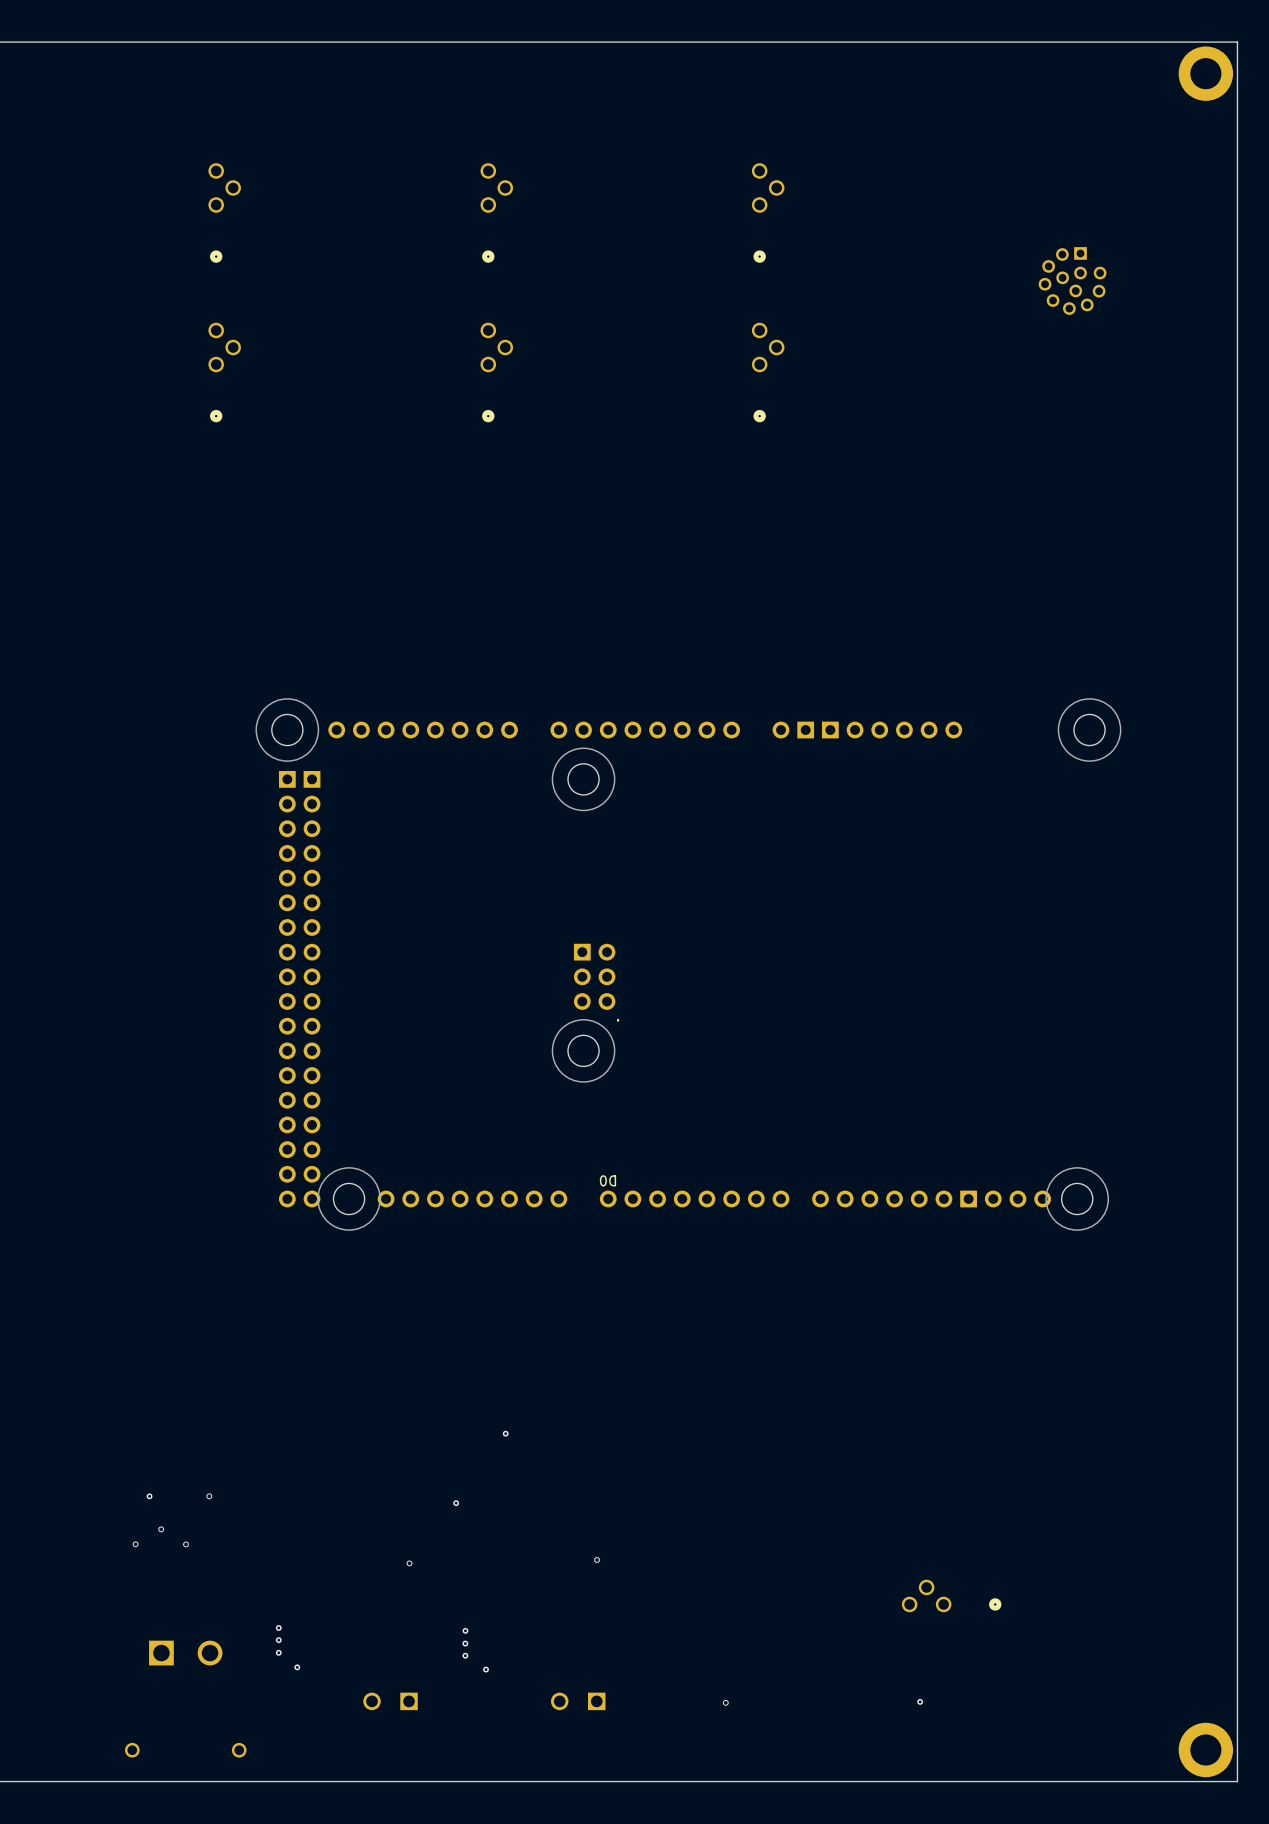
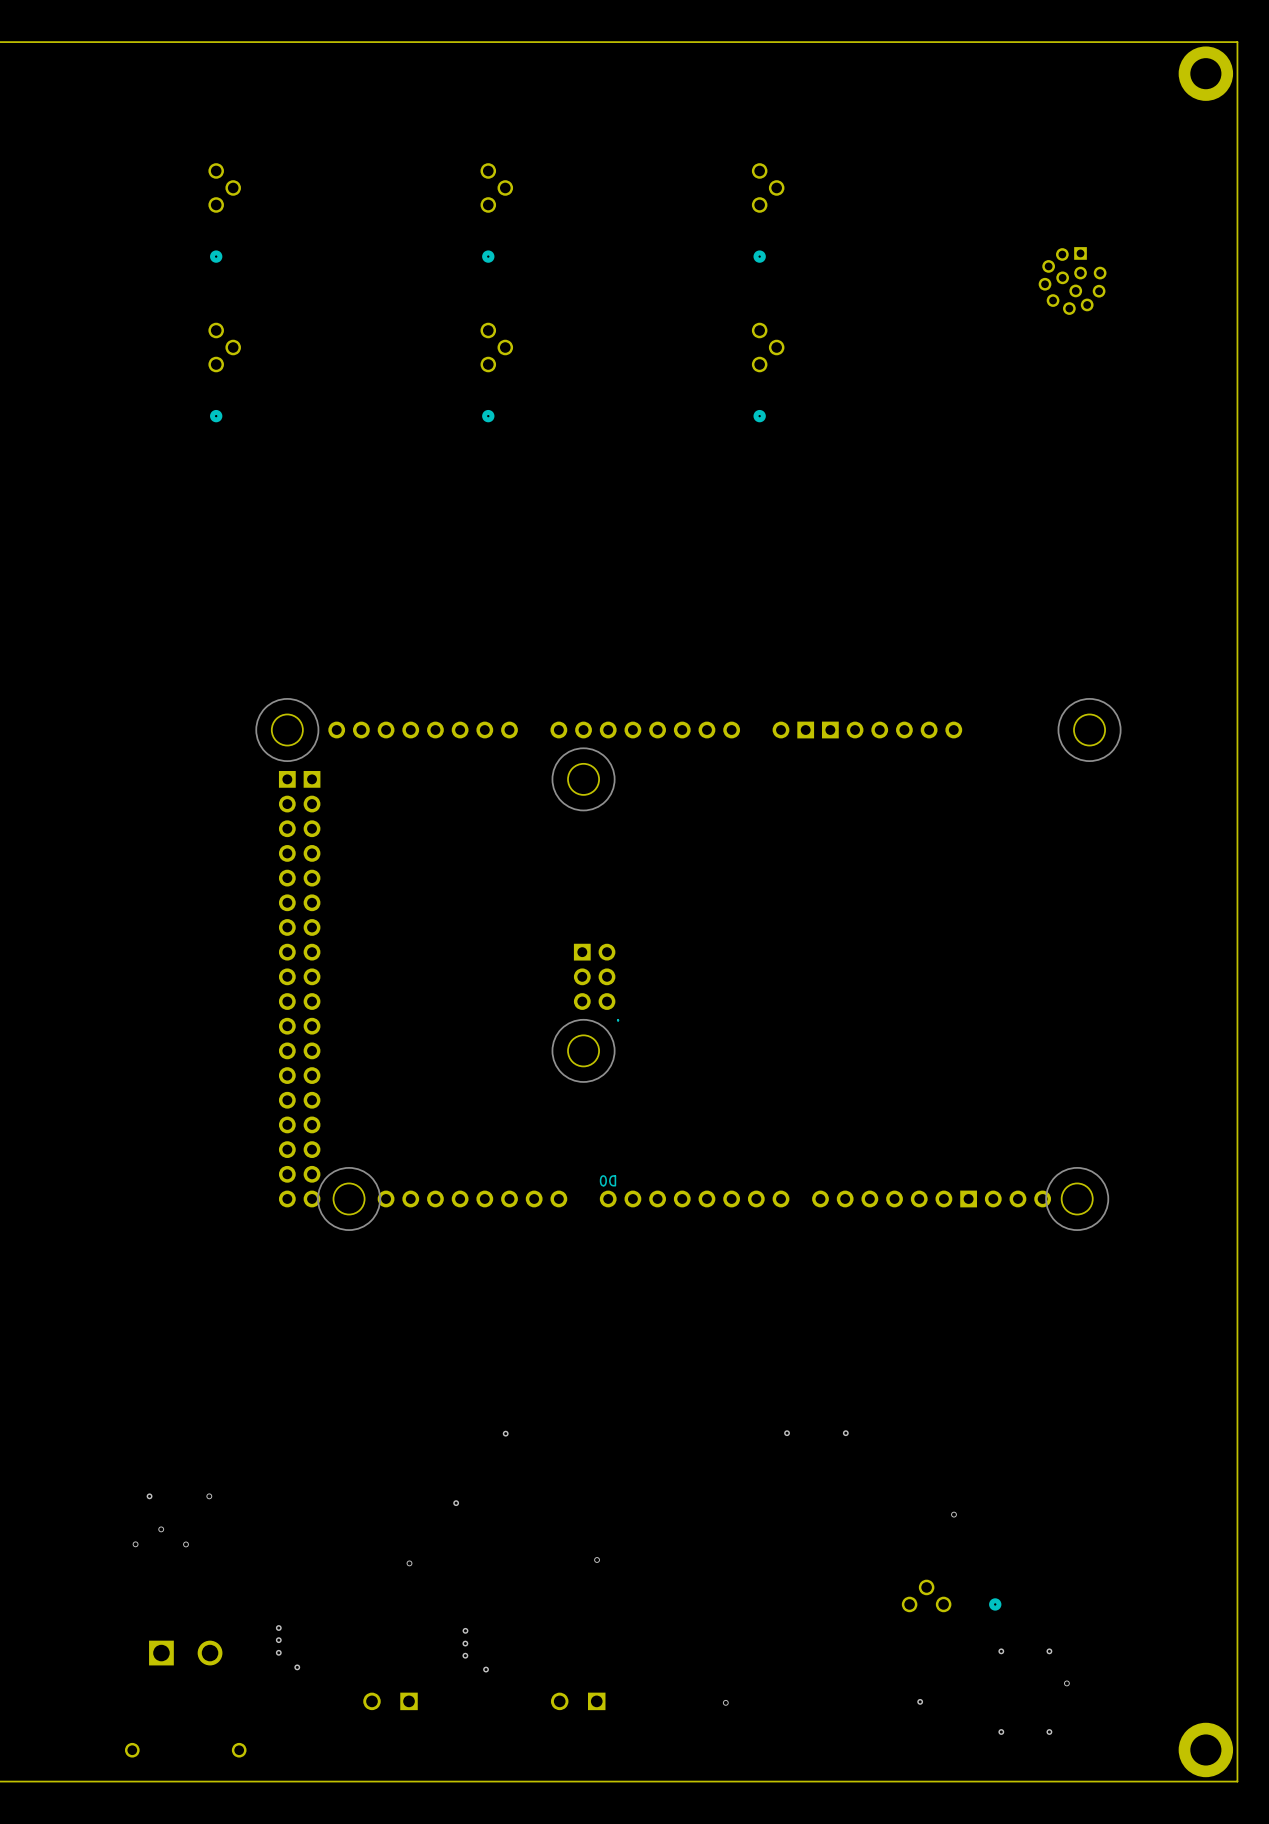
via: none -> (787, 1433)
via: none -> (845, 1433)
via: none -> (953, 1514)
via: none -> (1001, 1651)
via: none -> (1049, 1651)
via: none -> (1066, 1683)
via: none -> (1001, 1732)
via: none -> (1049, 1732)

